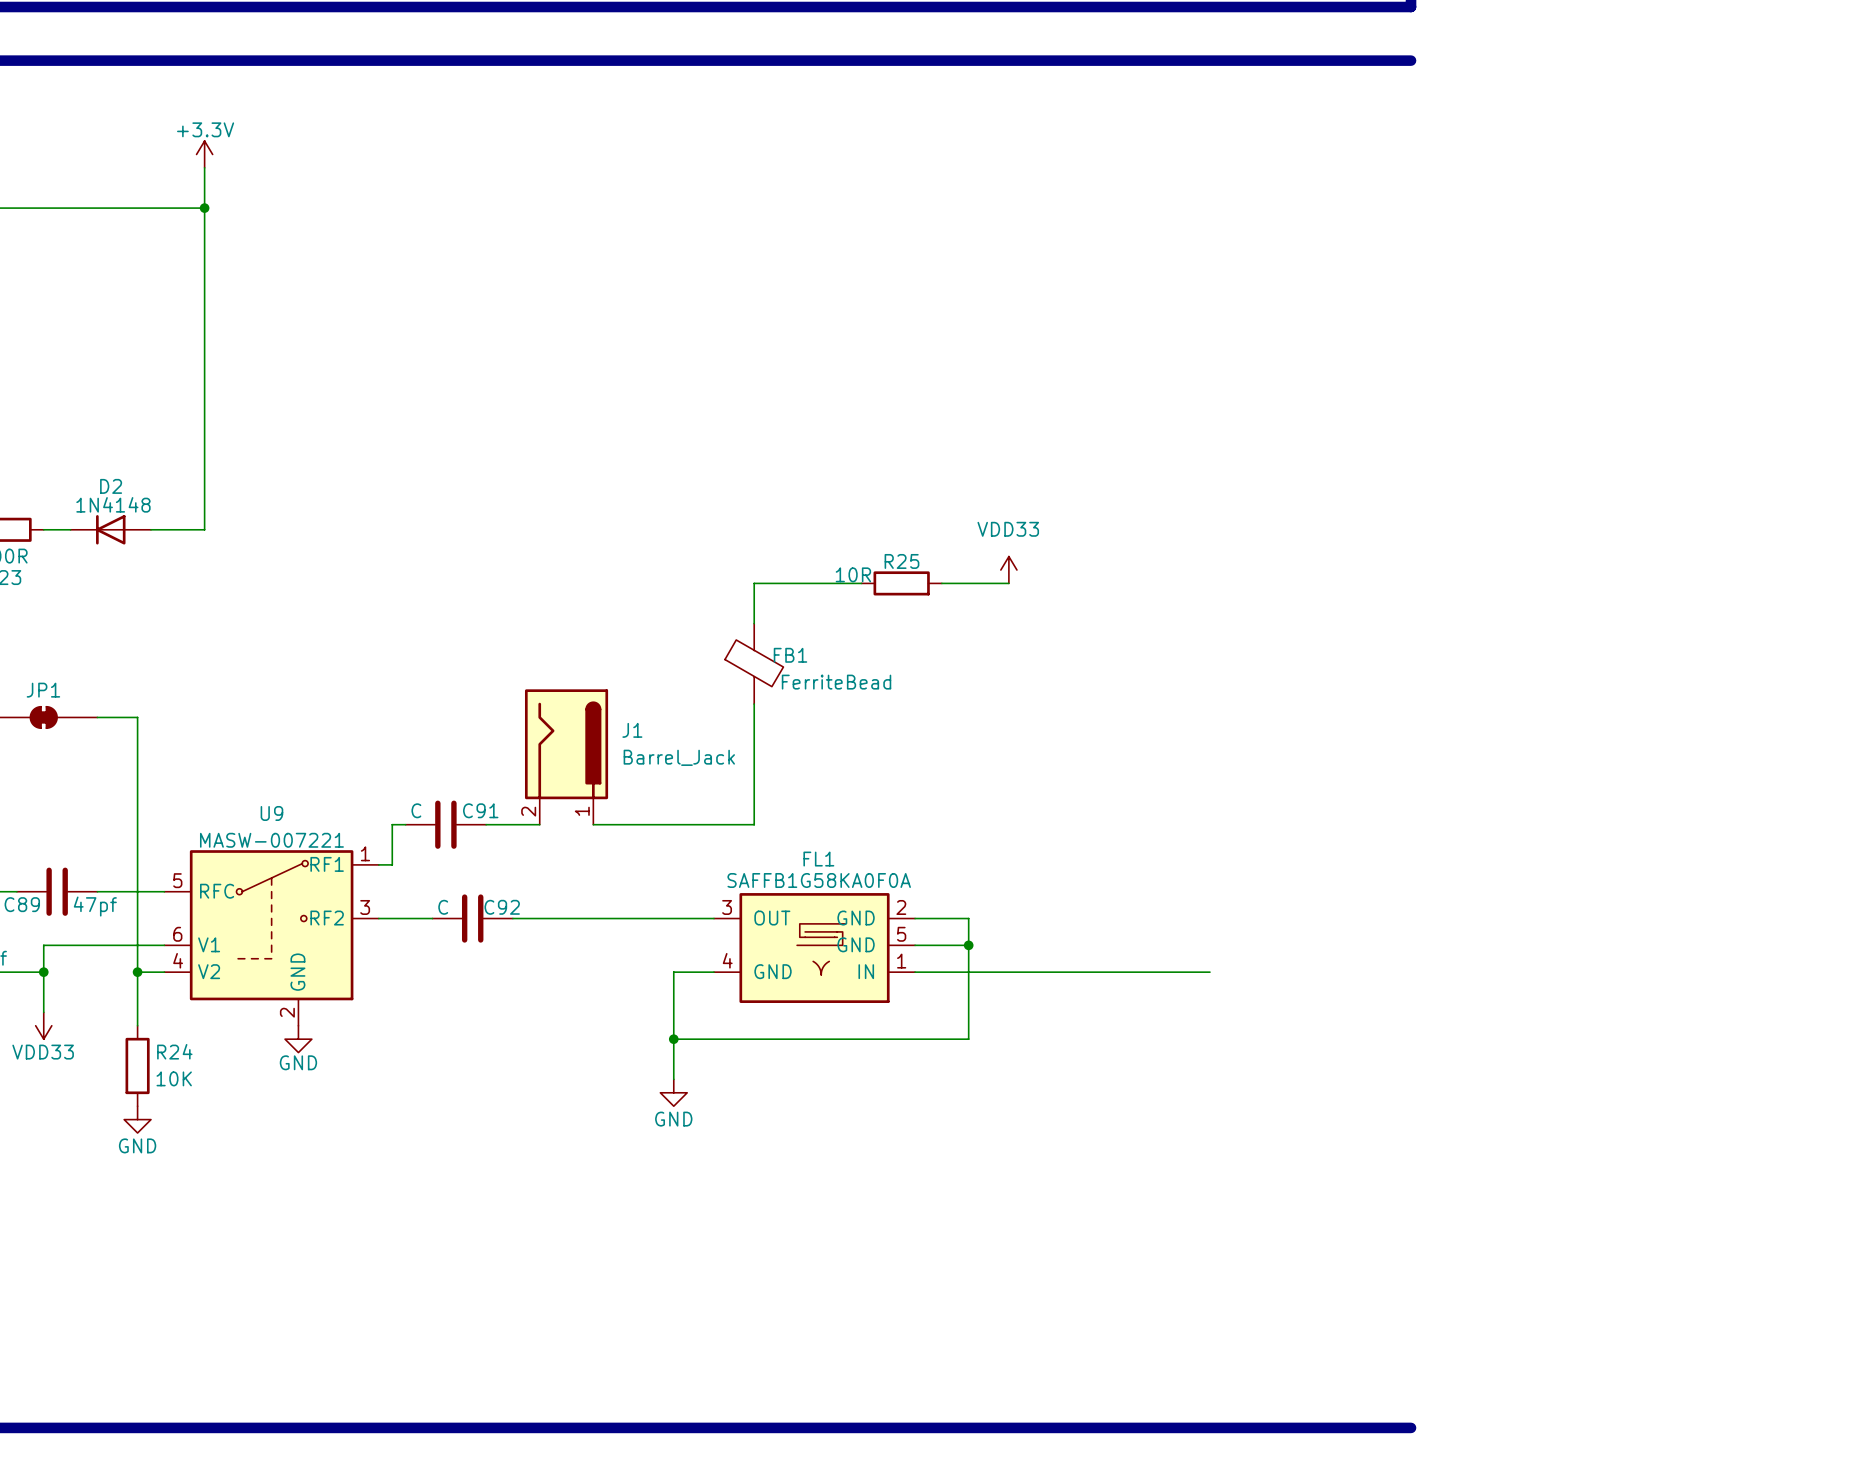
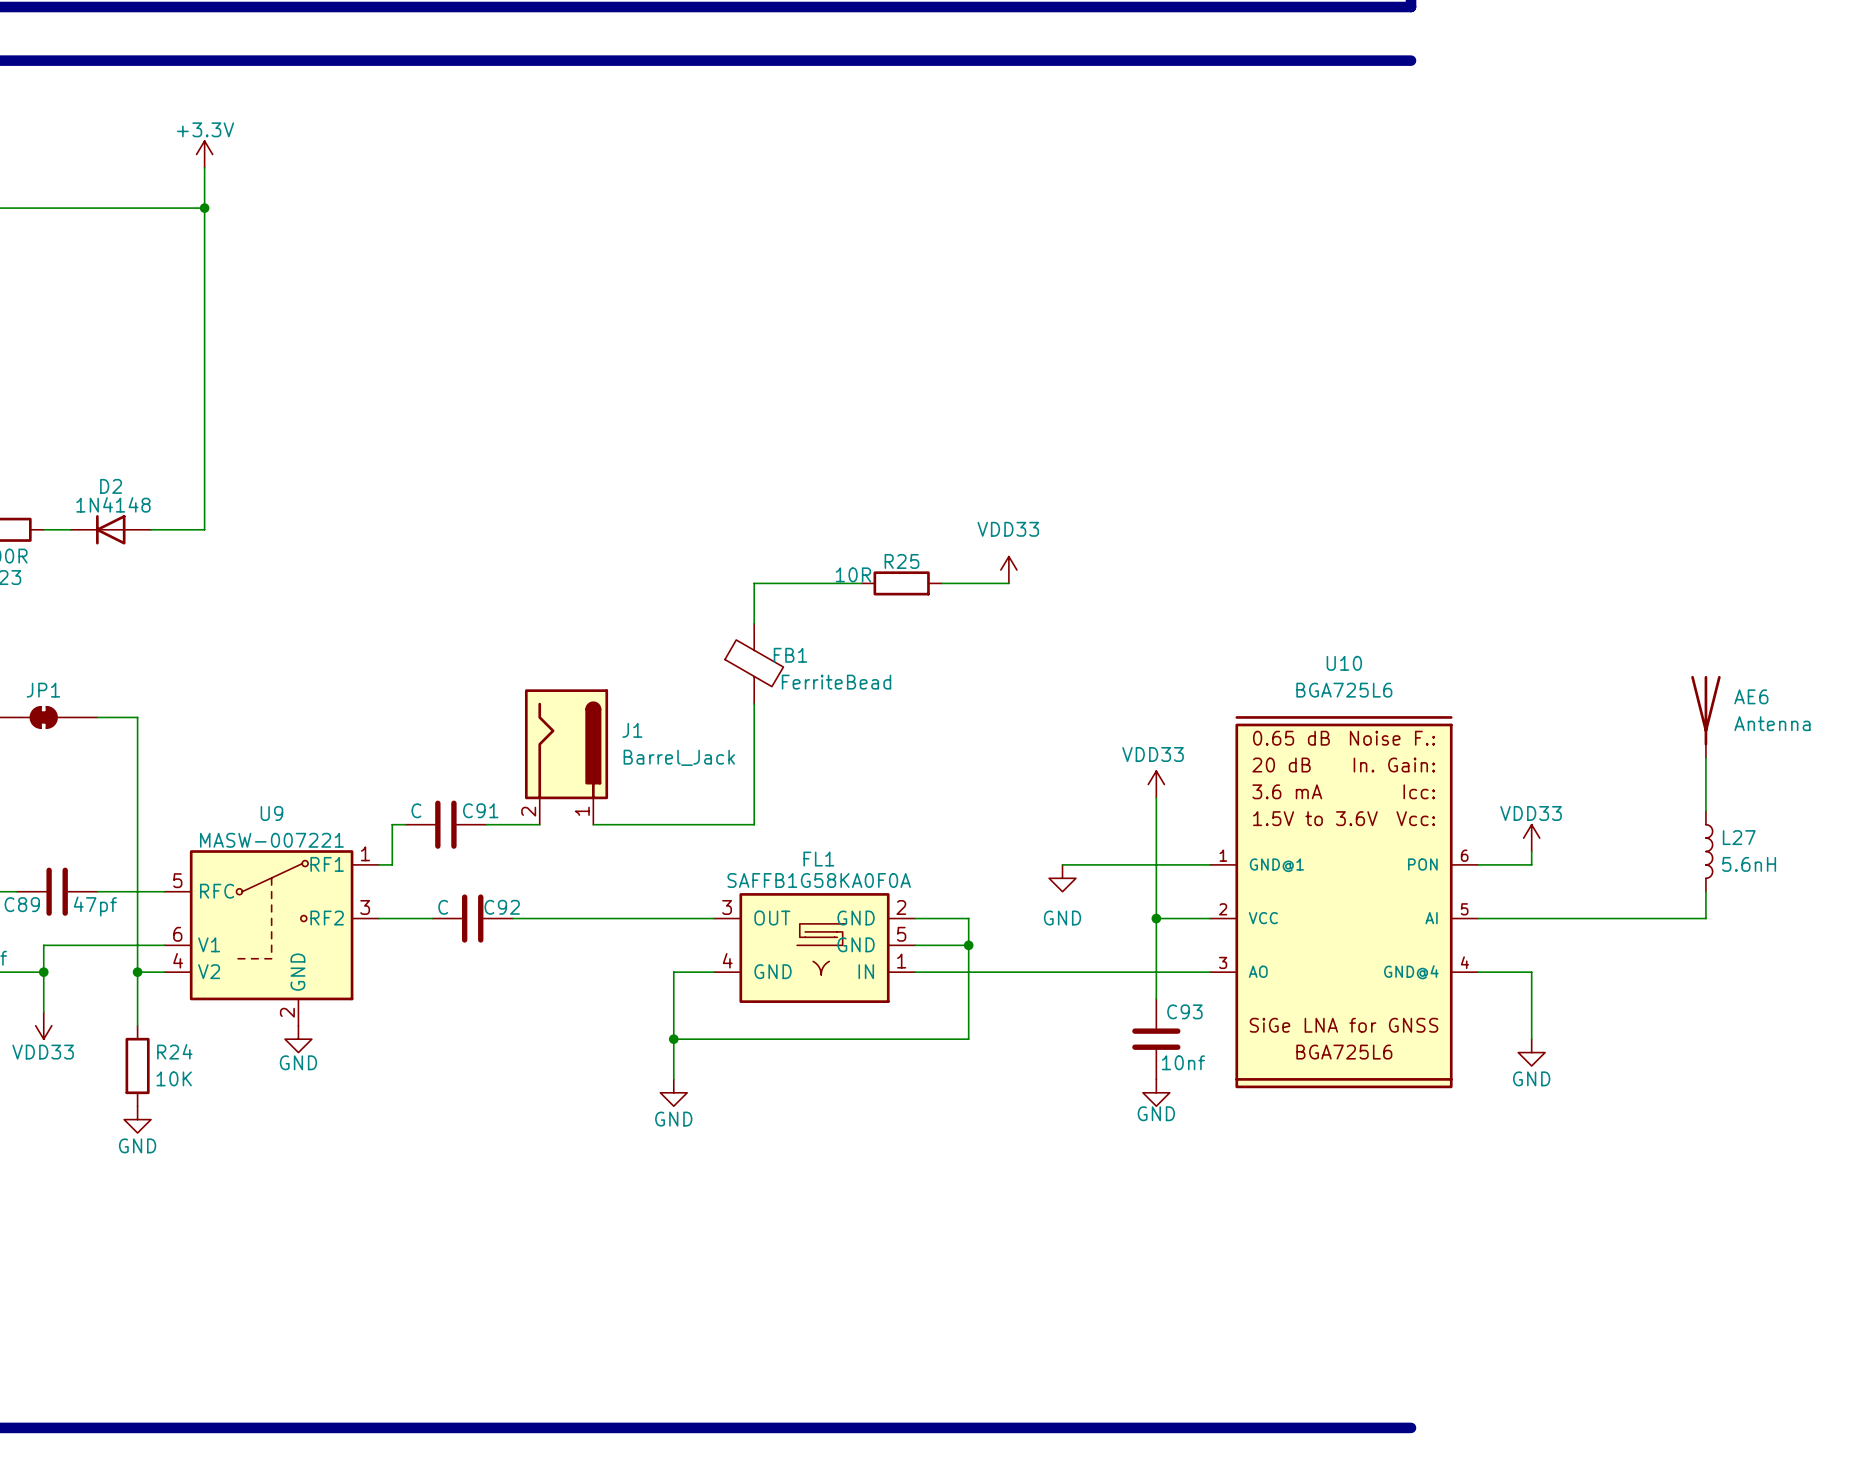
AE6: none -> Antenna (1705, 716)
wire: none -> (1705, 757) (1705, 811)
power symbol: none -> VDD33 (1156, 784)
wire: none -> (1156, 797) (1156, 998)
power symbol: none -> VDD33 (1531, 838)
wire: none -> (1531, 851) (1531, 864) (1478, 864)
L27: none -> 5.6nH (1709, 851)
wire: none -> (1062, 864) (1209, 864)
power symbol: none -> GND (1062, 878)
wire: none -> (1705, 891) (1705, 918) (1478, 918)
U10: none -> BGA725L6 (1344, 902)
wire: none -> (1156, 918) (1209, 918)
junction: none -> (1156, 918)
wire: none -> (1478, 972) (1531, 972) (1531, 1039)
C93: none -> 10nf (1156, 1039)
power symbol: none -> GND (1531, 1052)
power symbol: none -> GND (1156, 1092)

